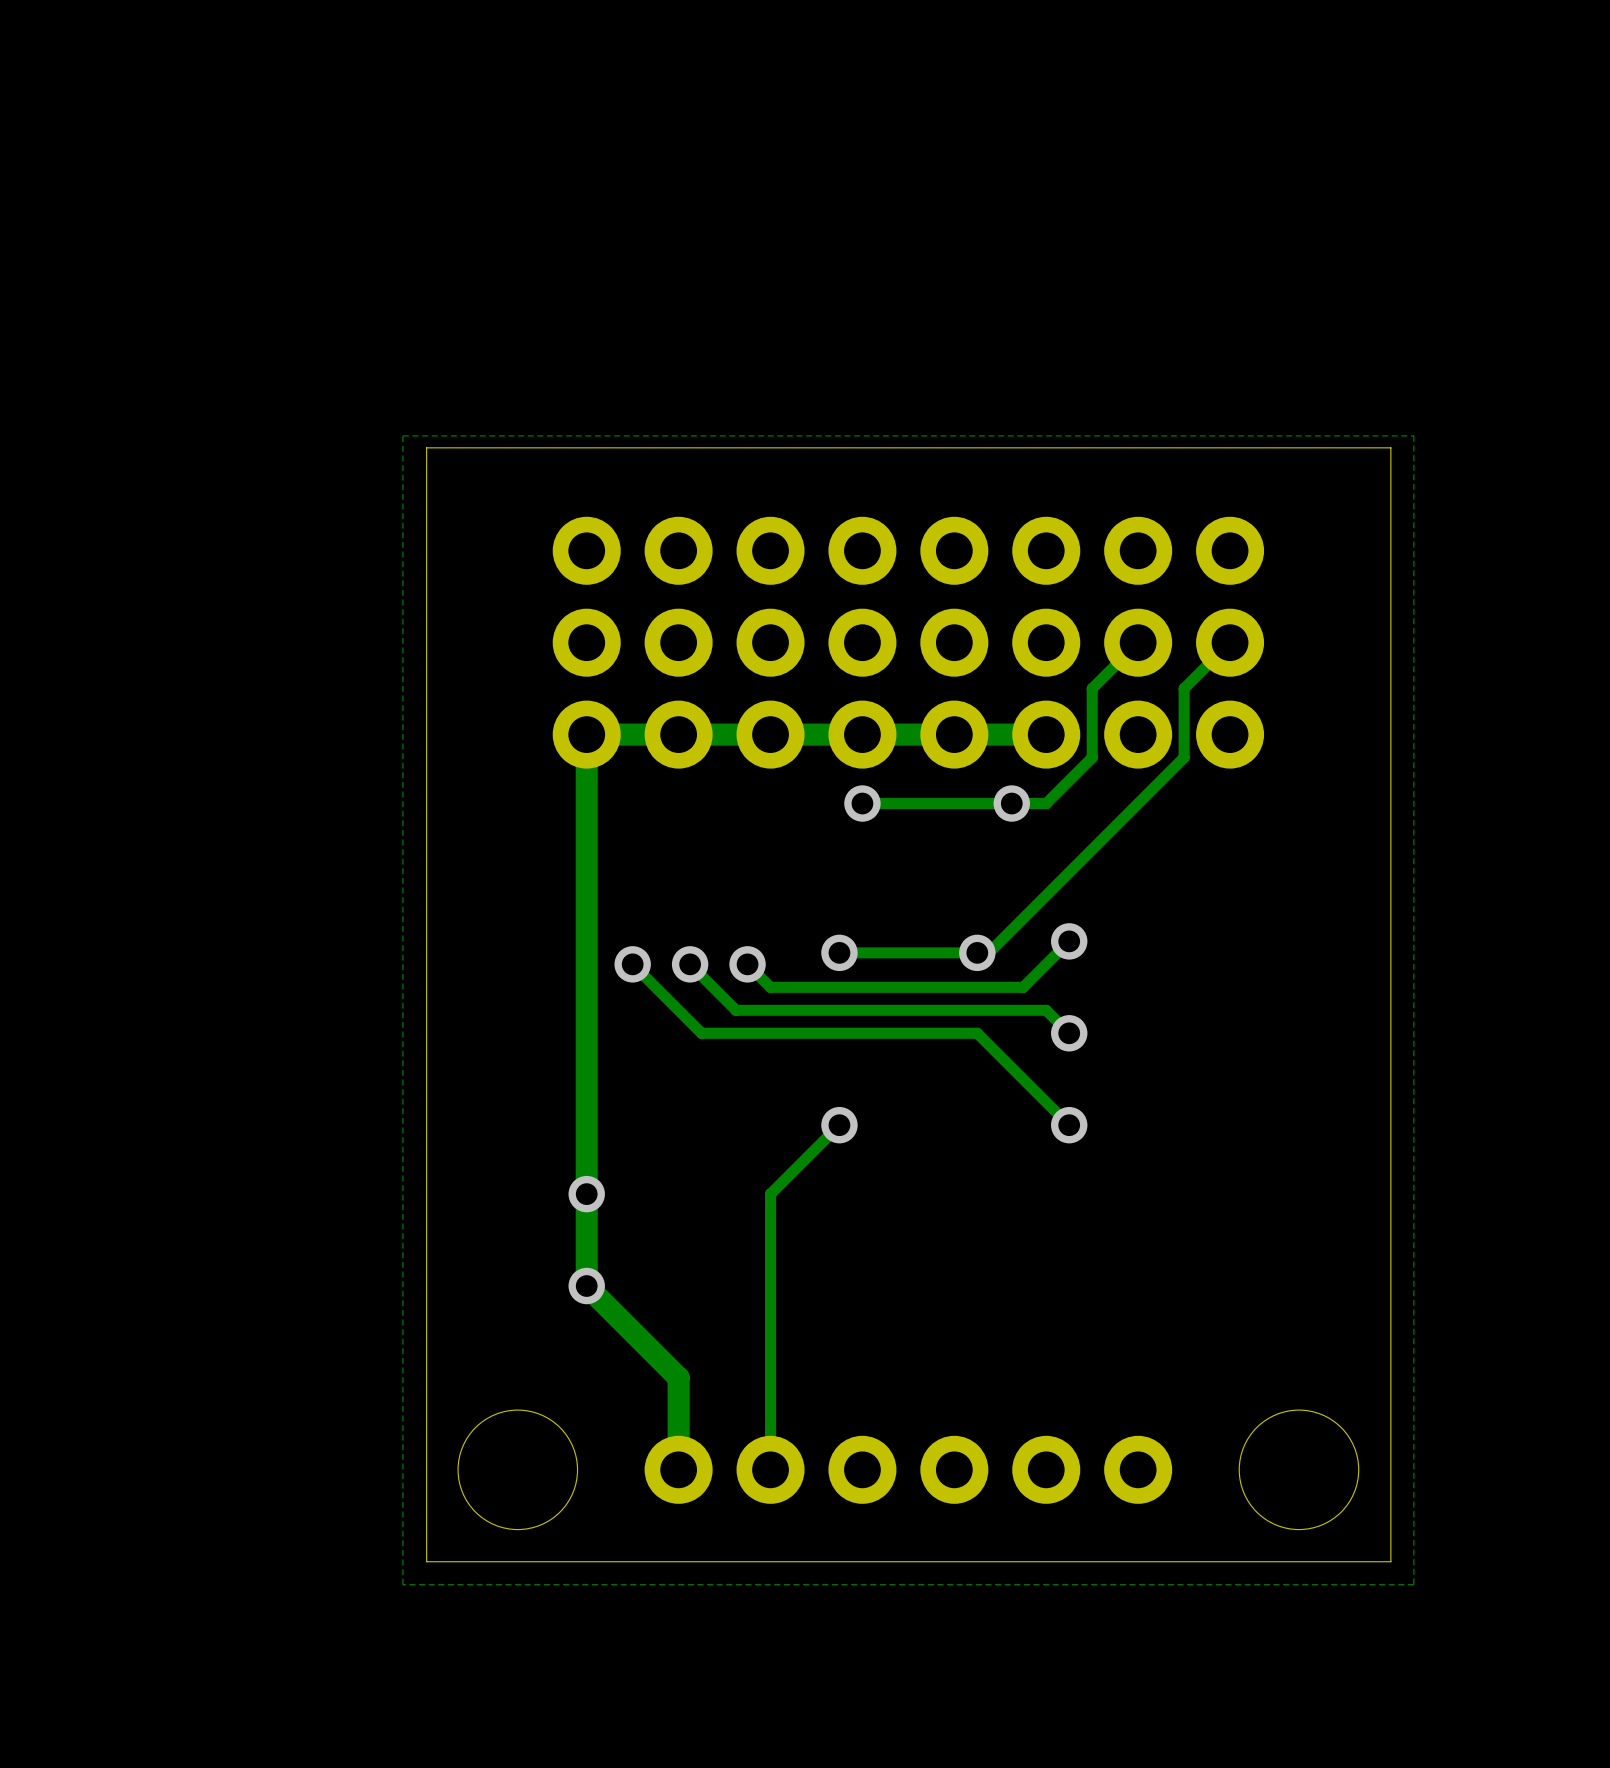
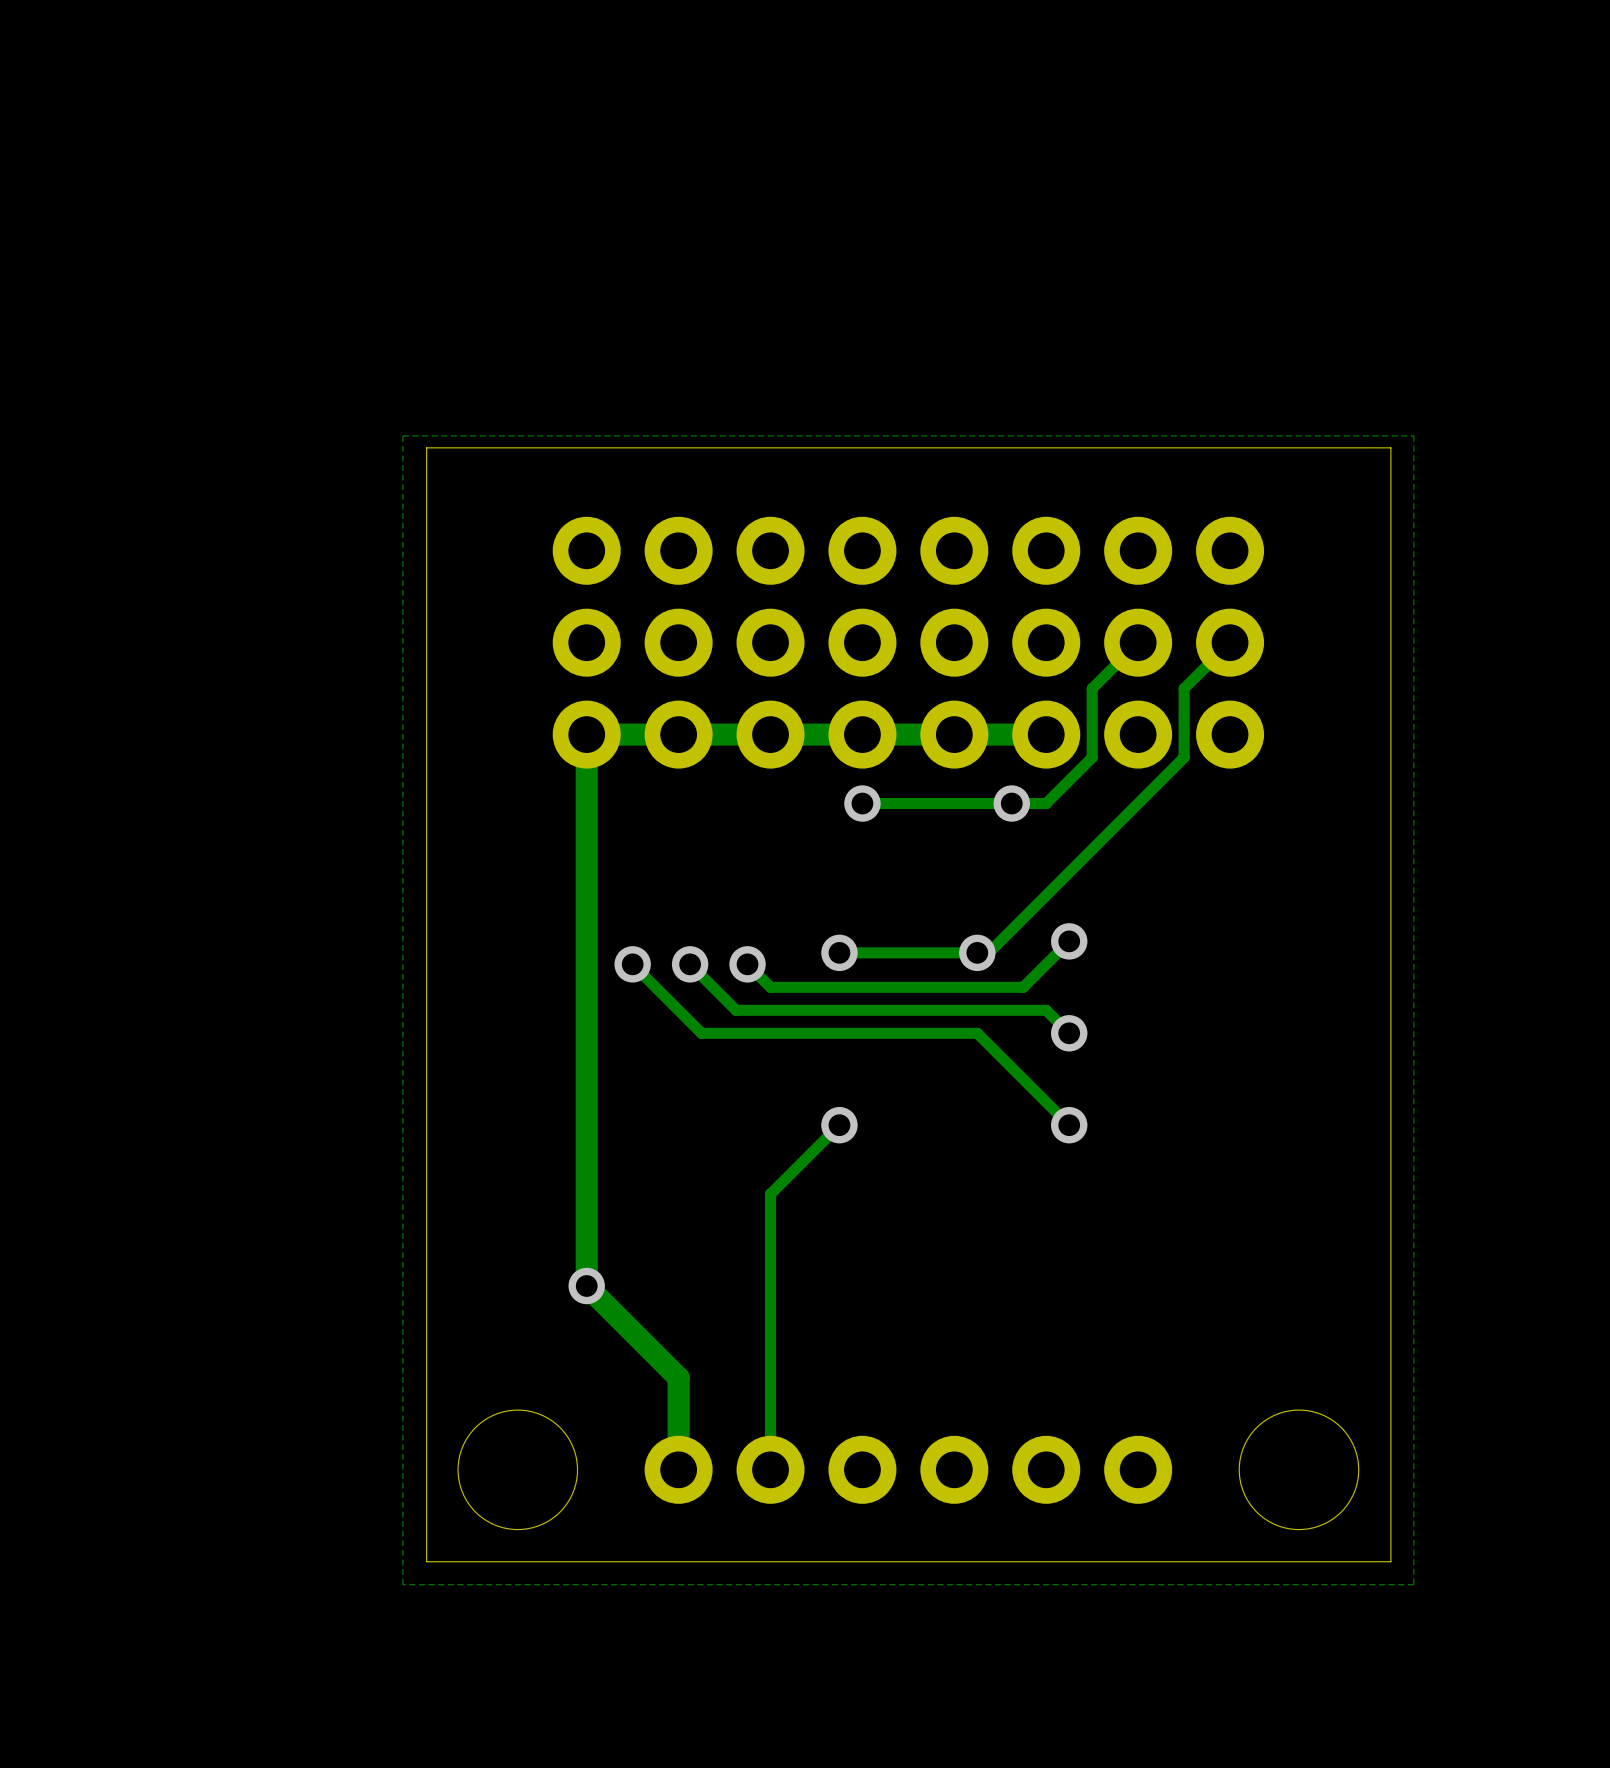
via: (586, 1194) -> none

